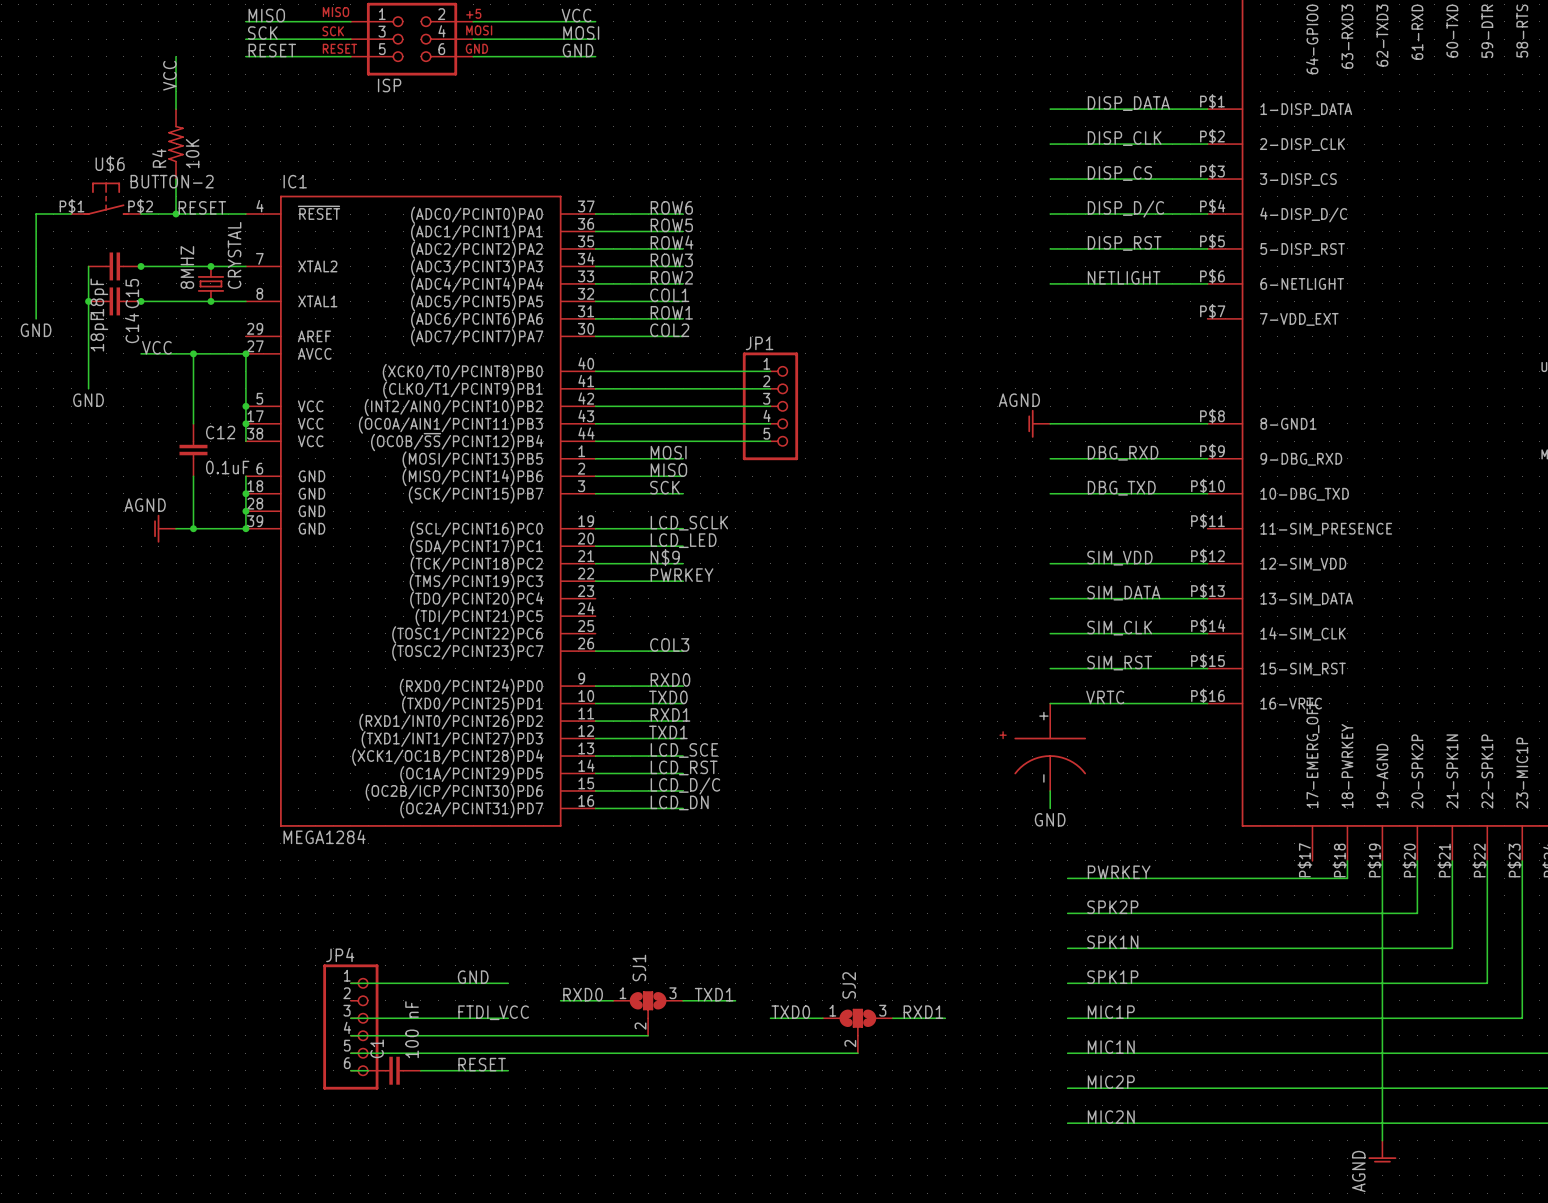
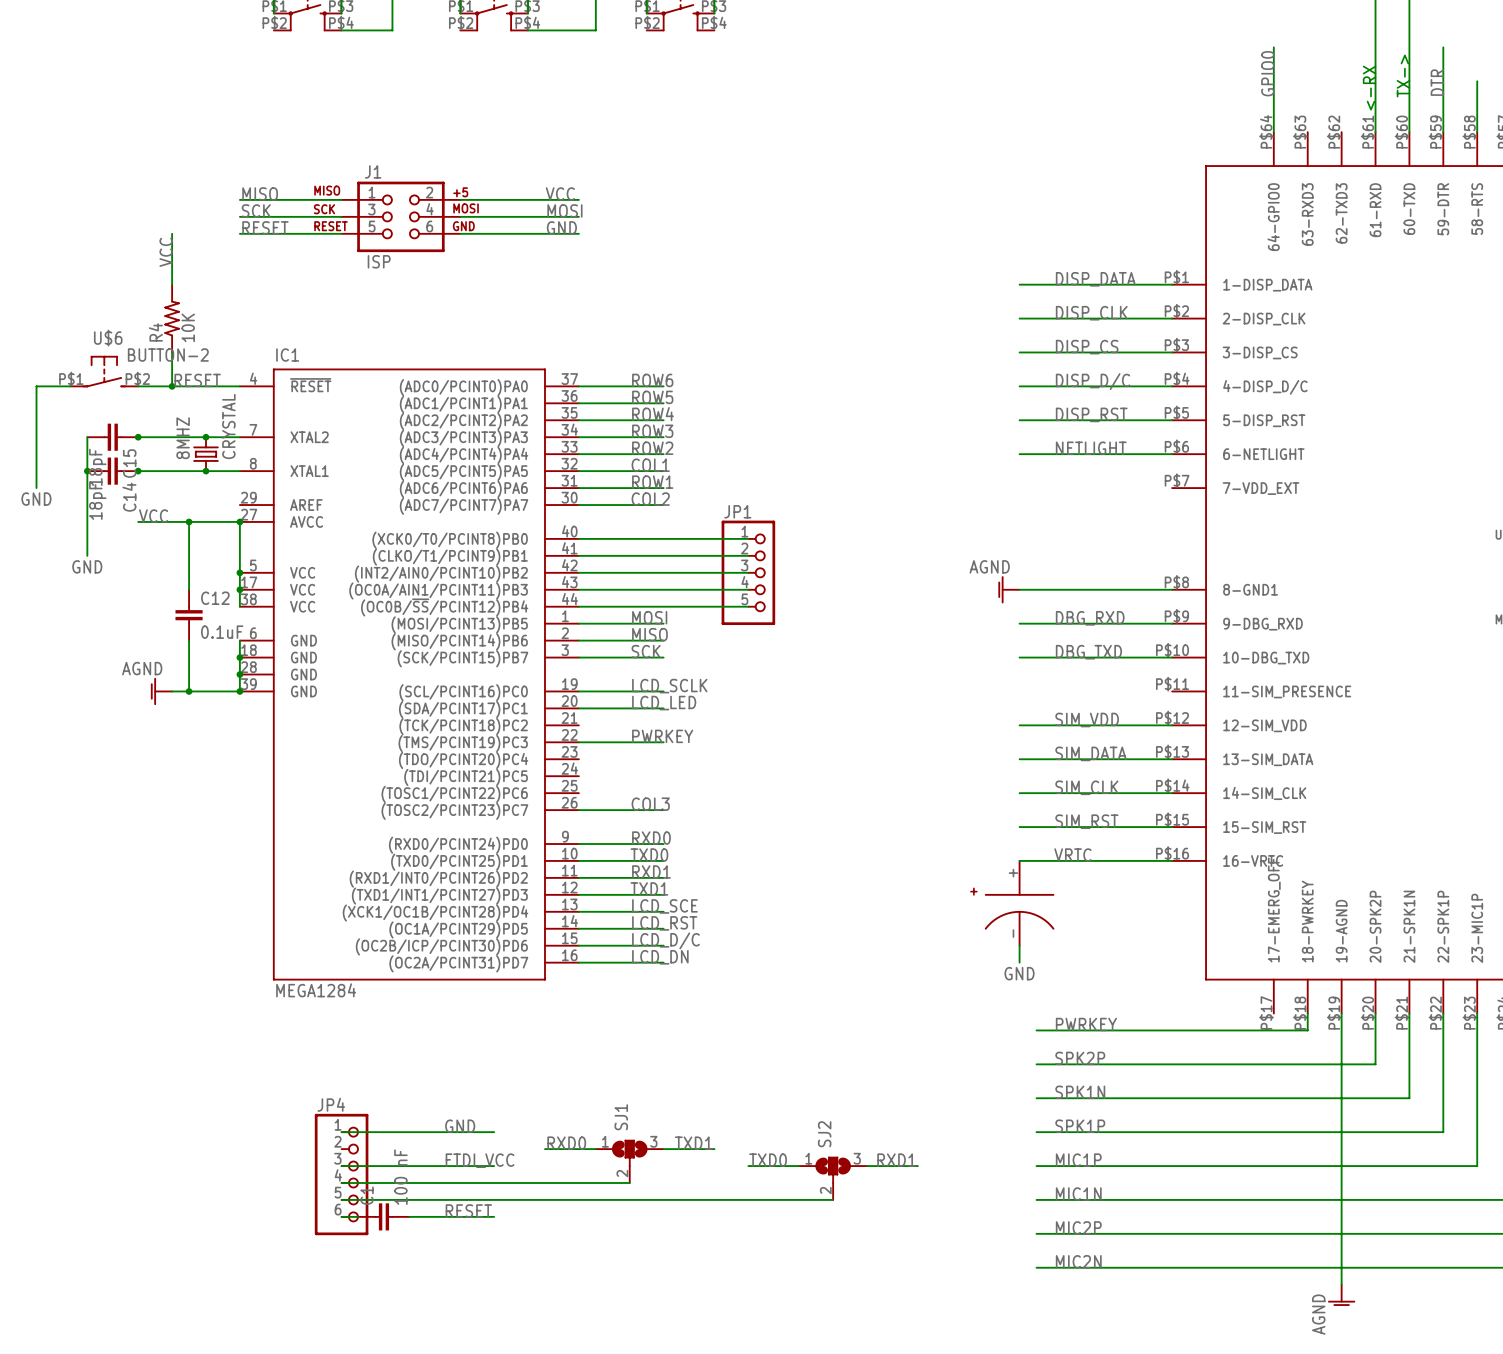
label: N$9 (665, 557) -> none
wire: (595, 563) (683, 563) -> none

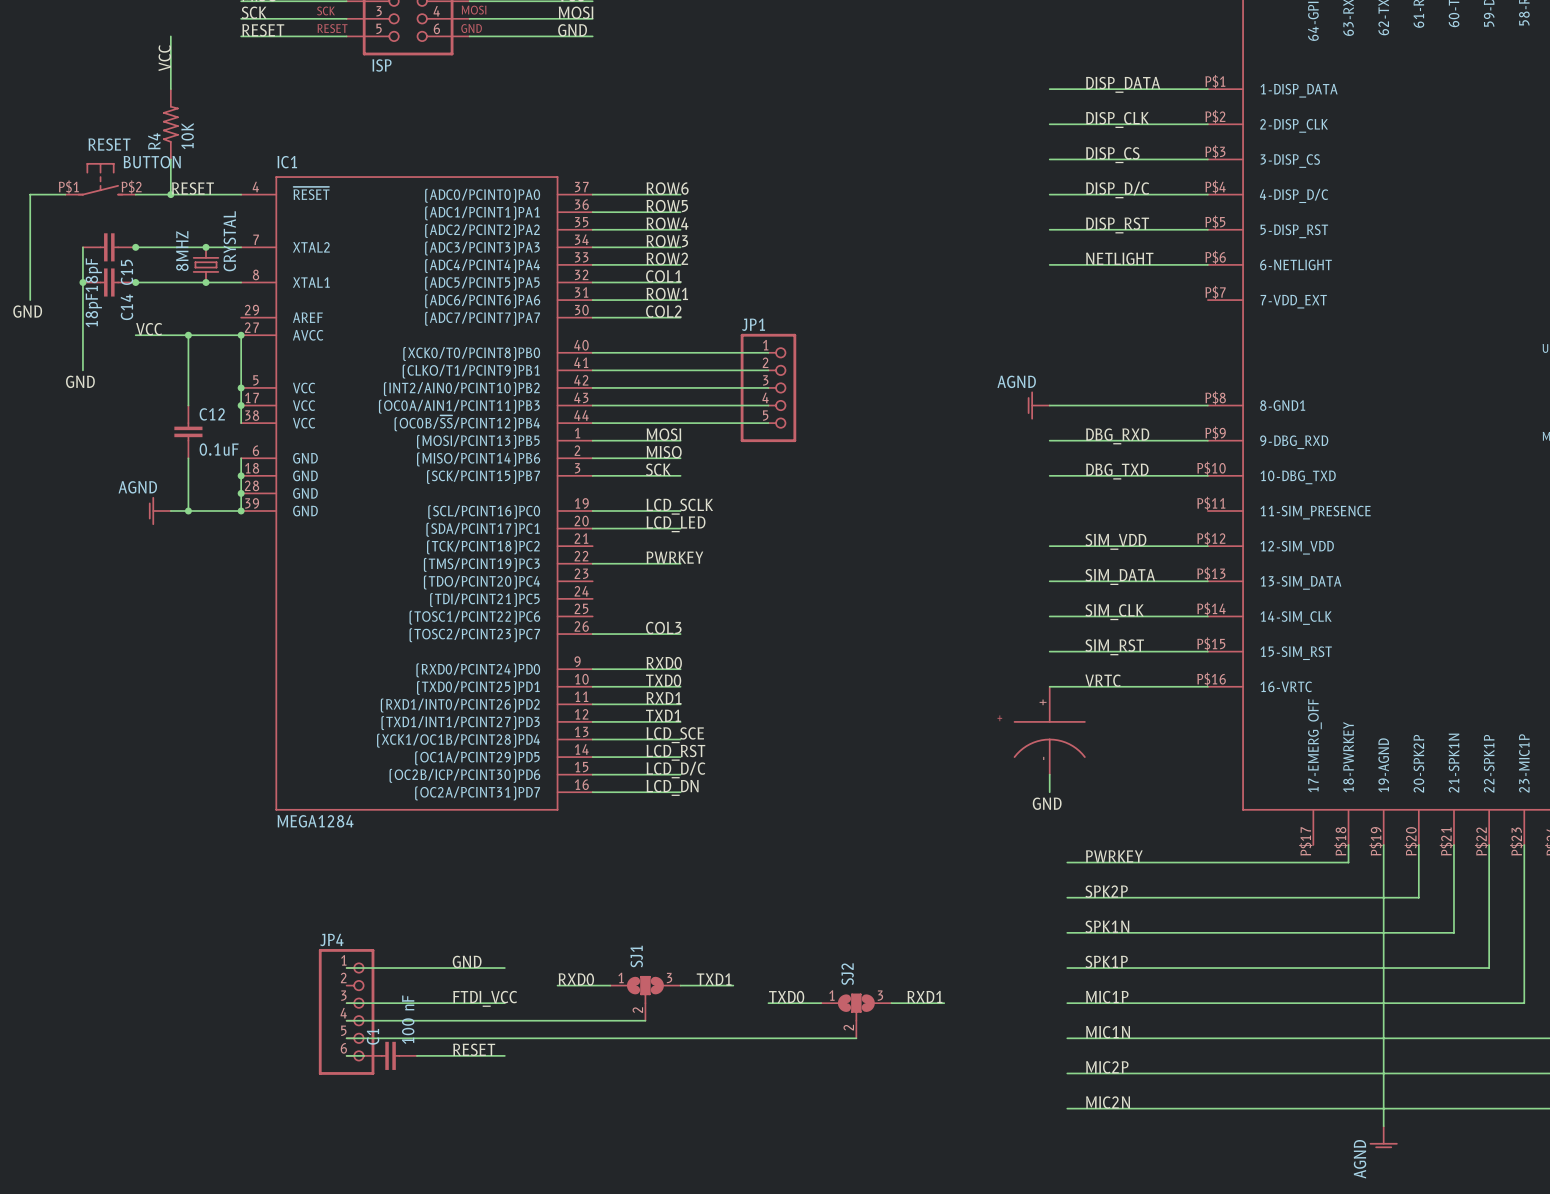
U$6 name: U$6 (108, 338) -> RESET (109, 144)
U$6 value: BUTTON-2 (168, 355) -> BUTTON (152, 162)

